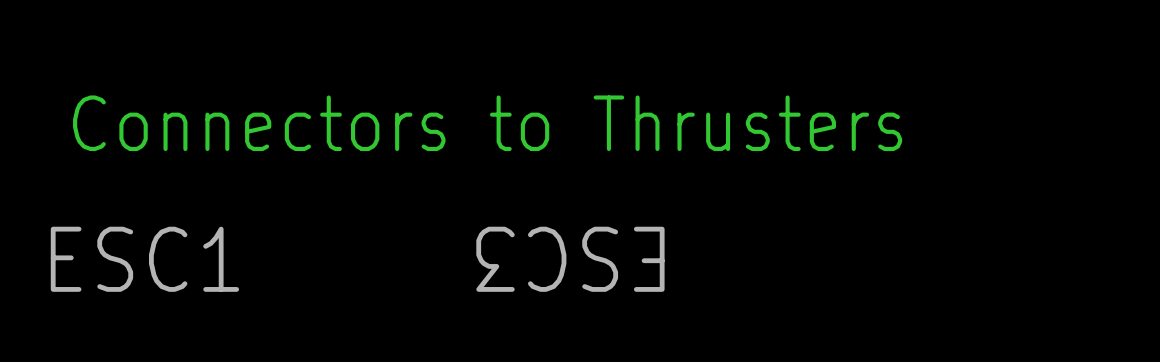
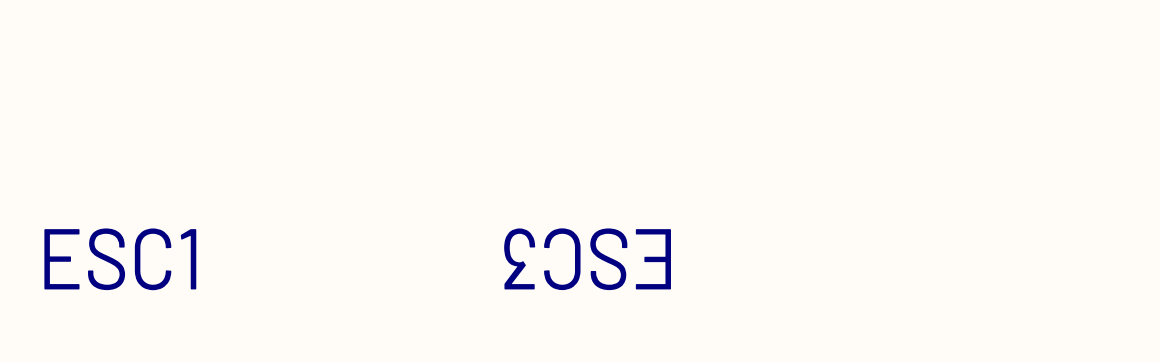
text: Connectors to Thrusters (487, 123) -> none

